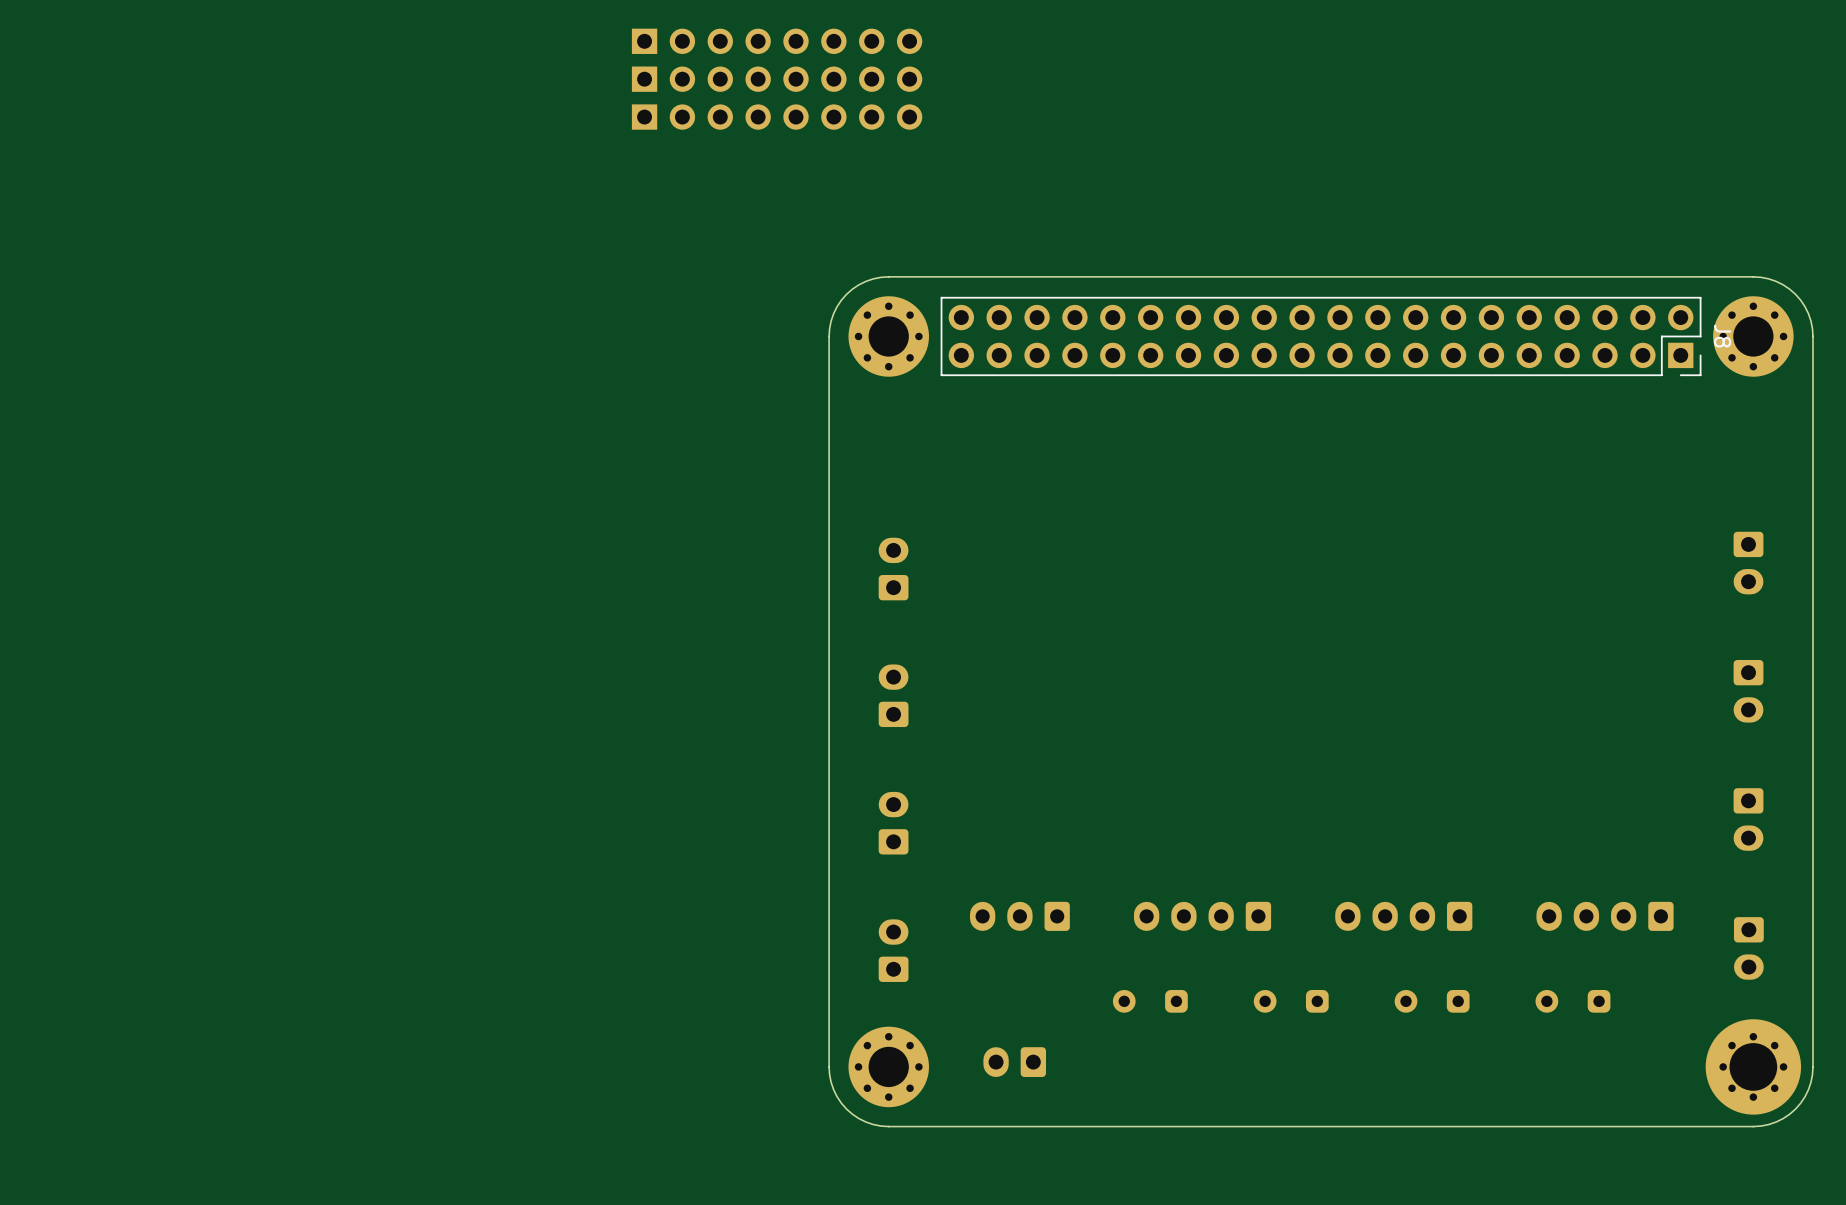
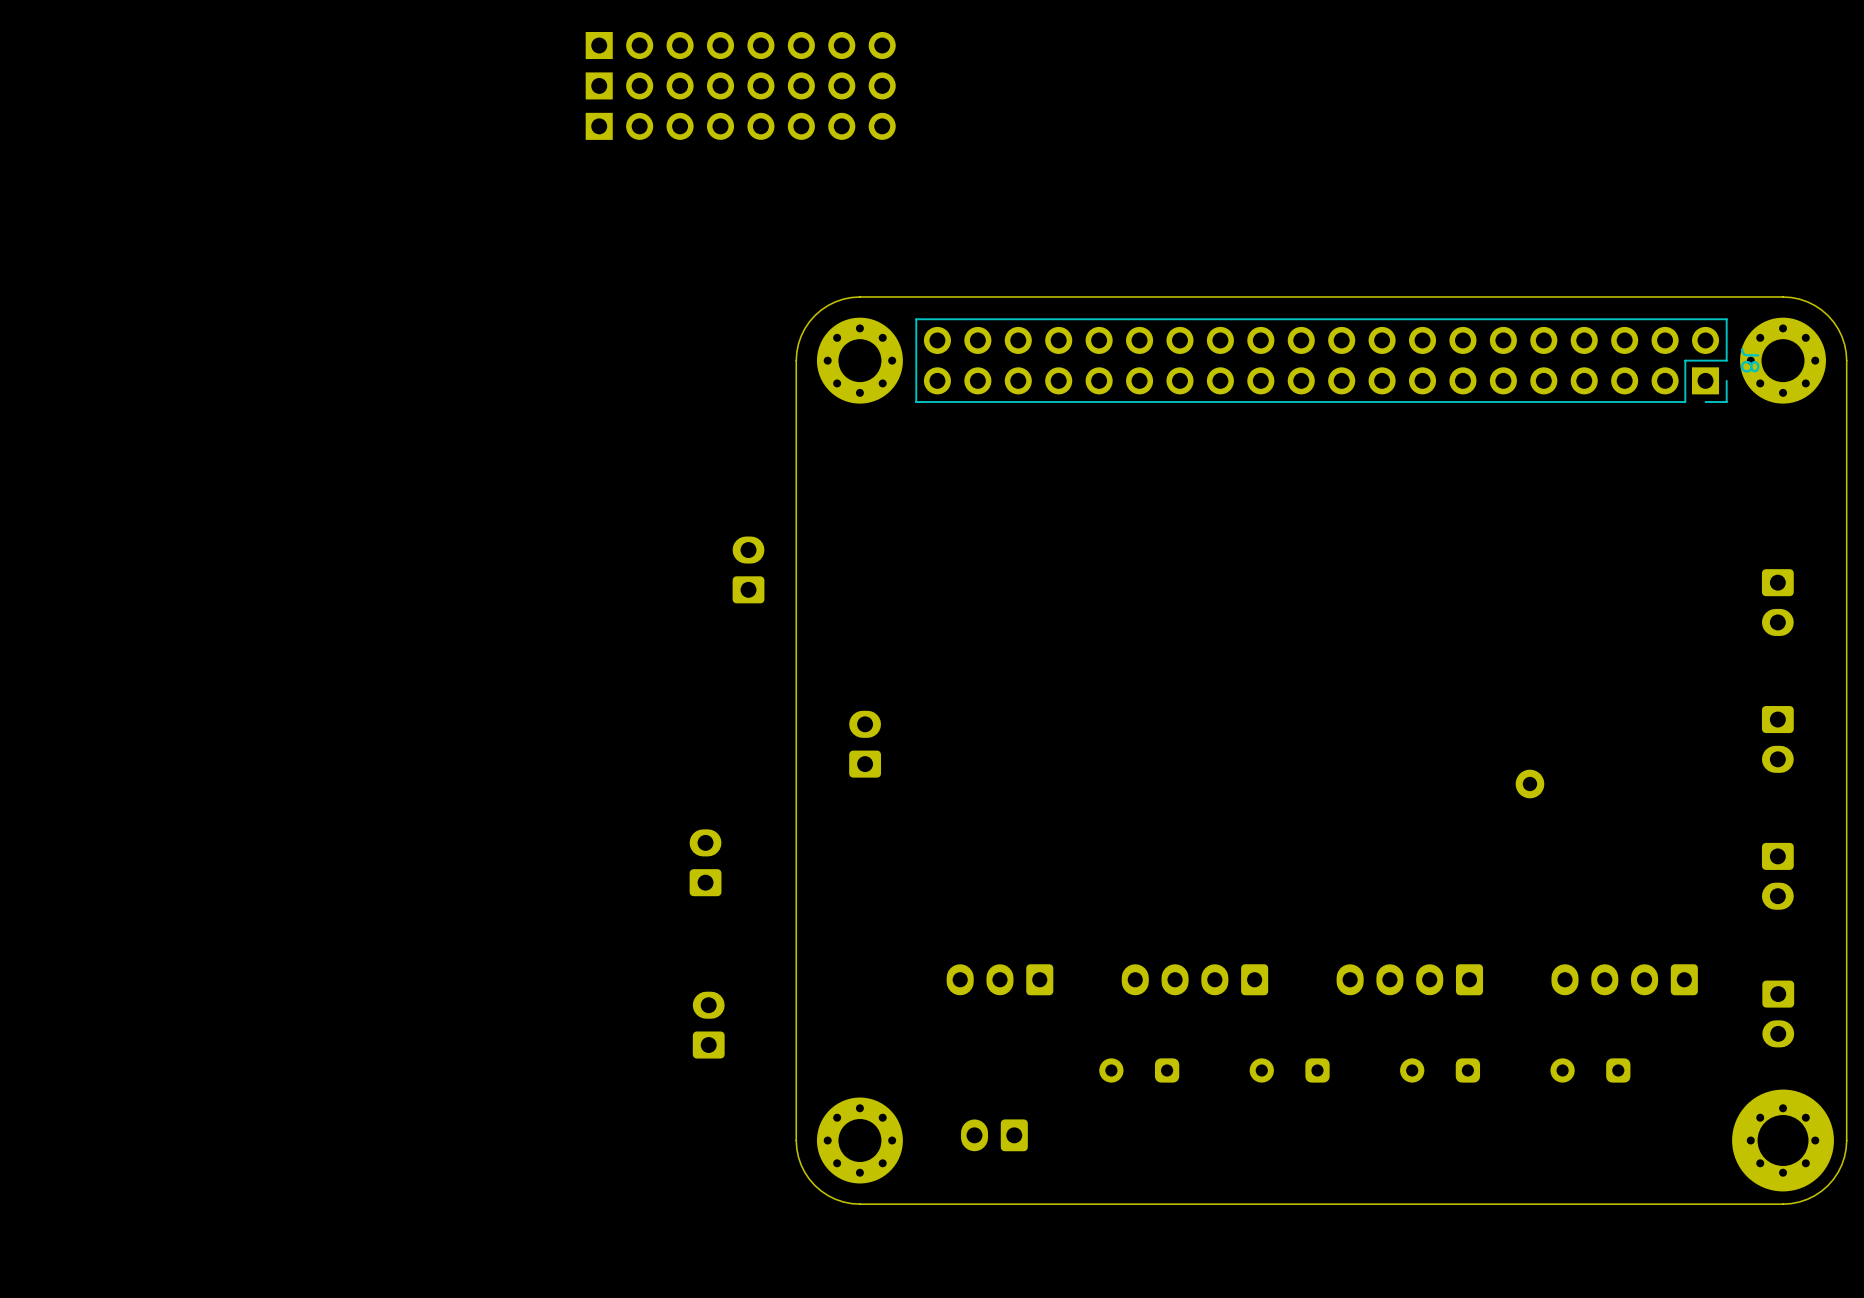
part position: (893, 569) -> (748, 569)
part: none -> (1529, 784)
part: none -> (705, 862)
part: (893, 823) -> none
part: (893, 950) -> none
part: none -> (708, 1025)

